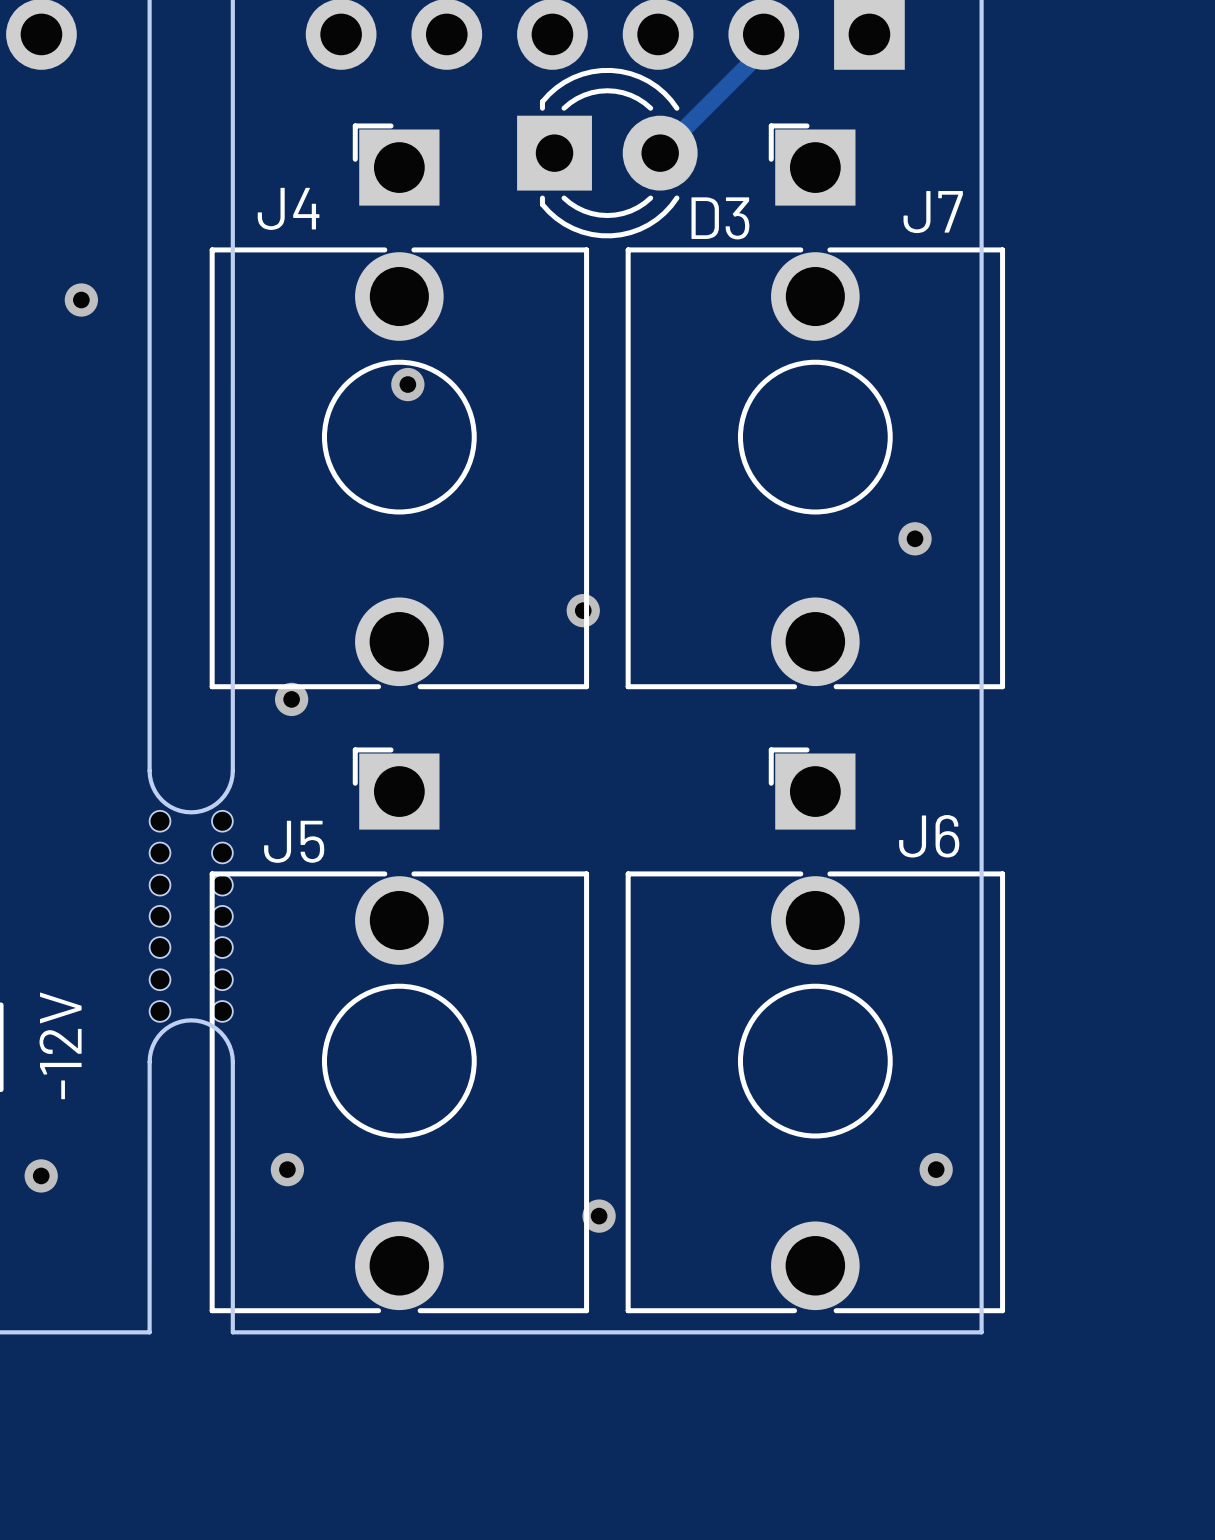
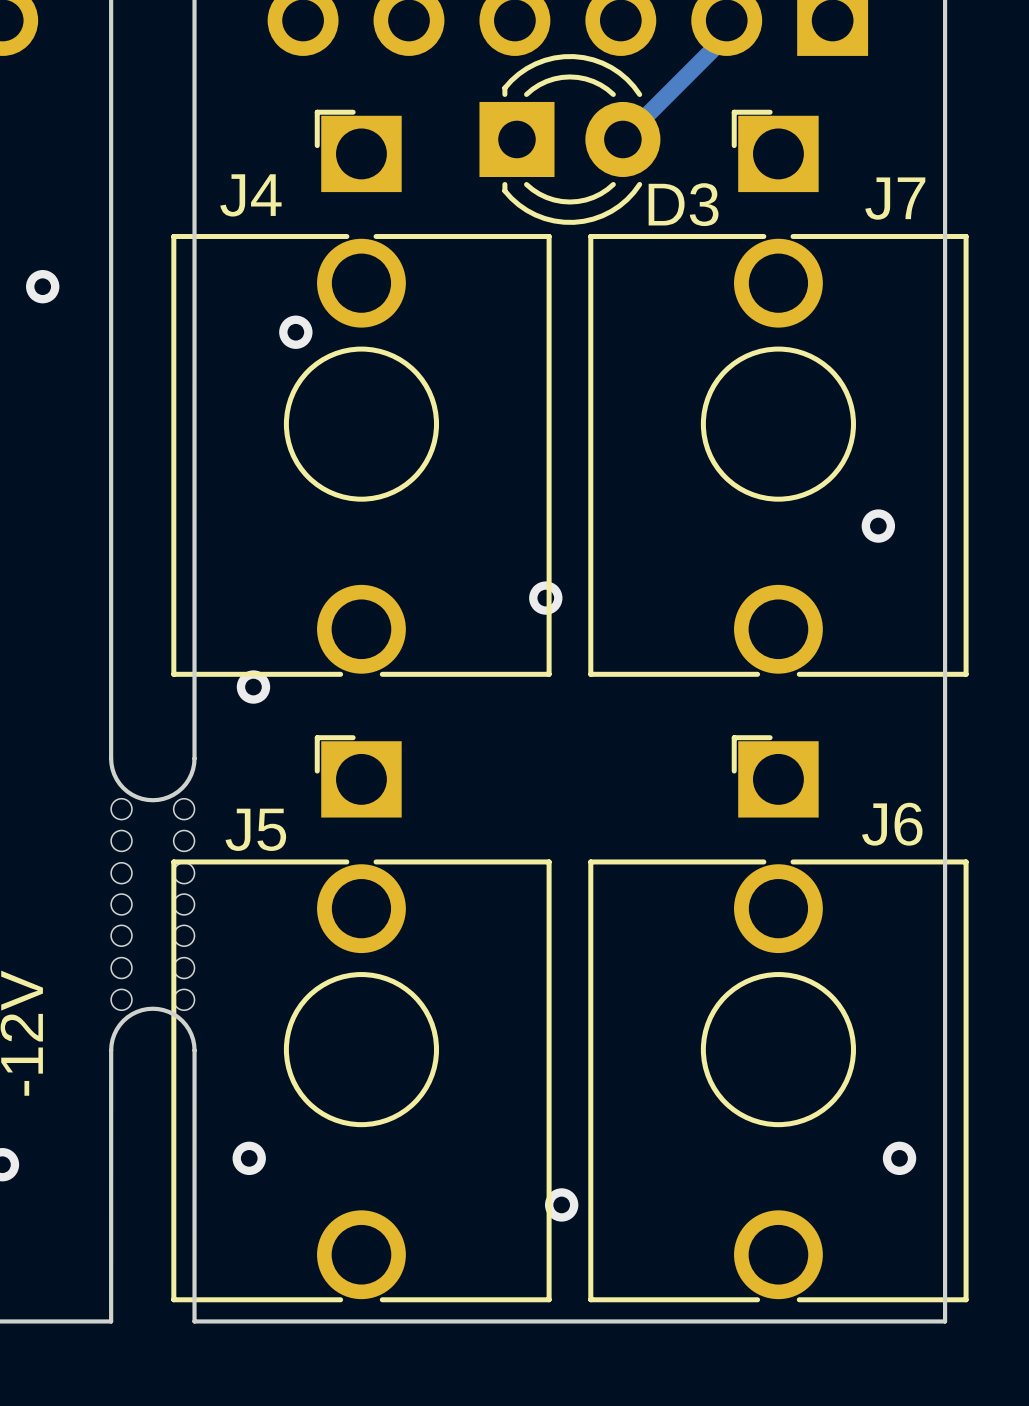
via position: (407, 384) -> (295, 332)

